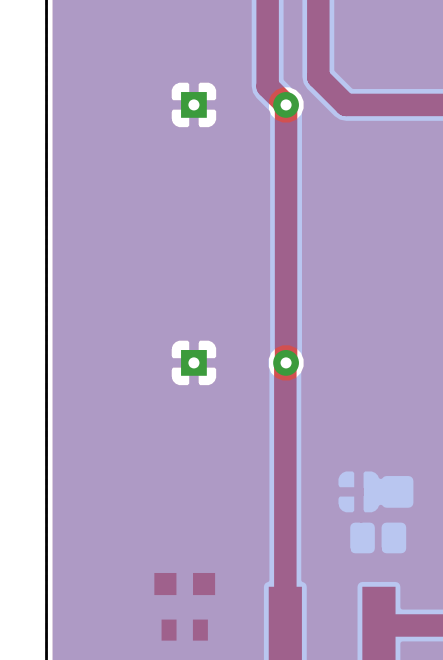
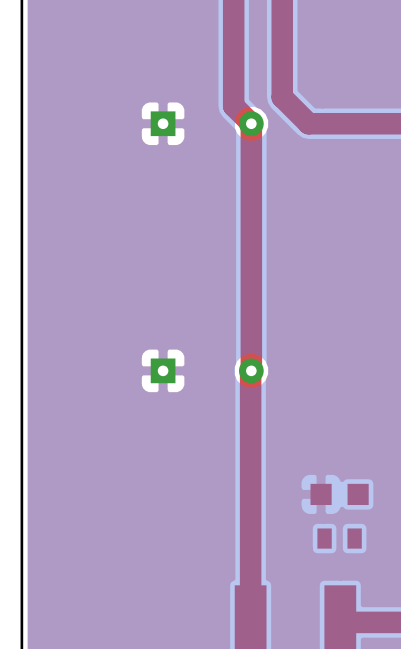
part position: (184, 584) -> (339, 494)
part position: (184, 630) -> (339, 538)

